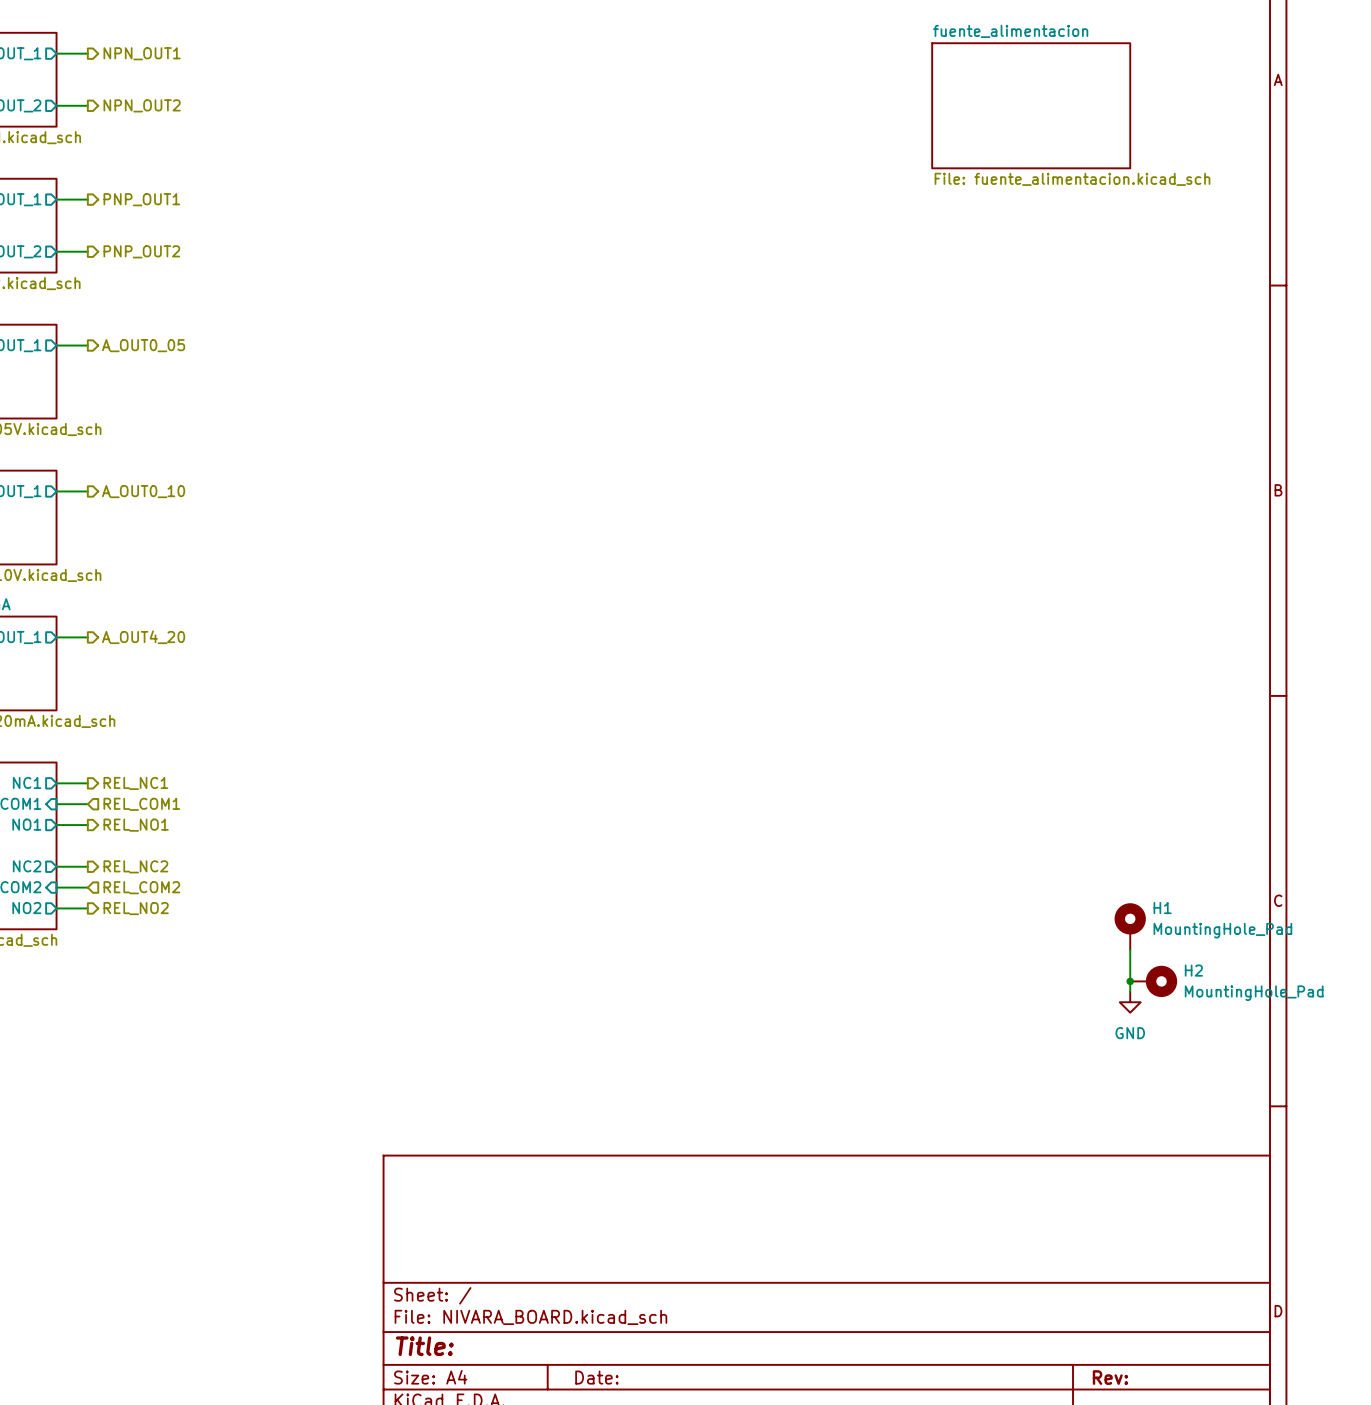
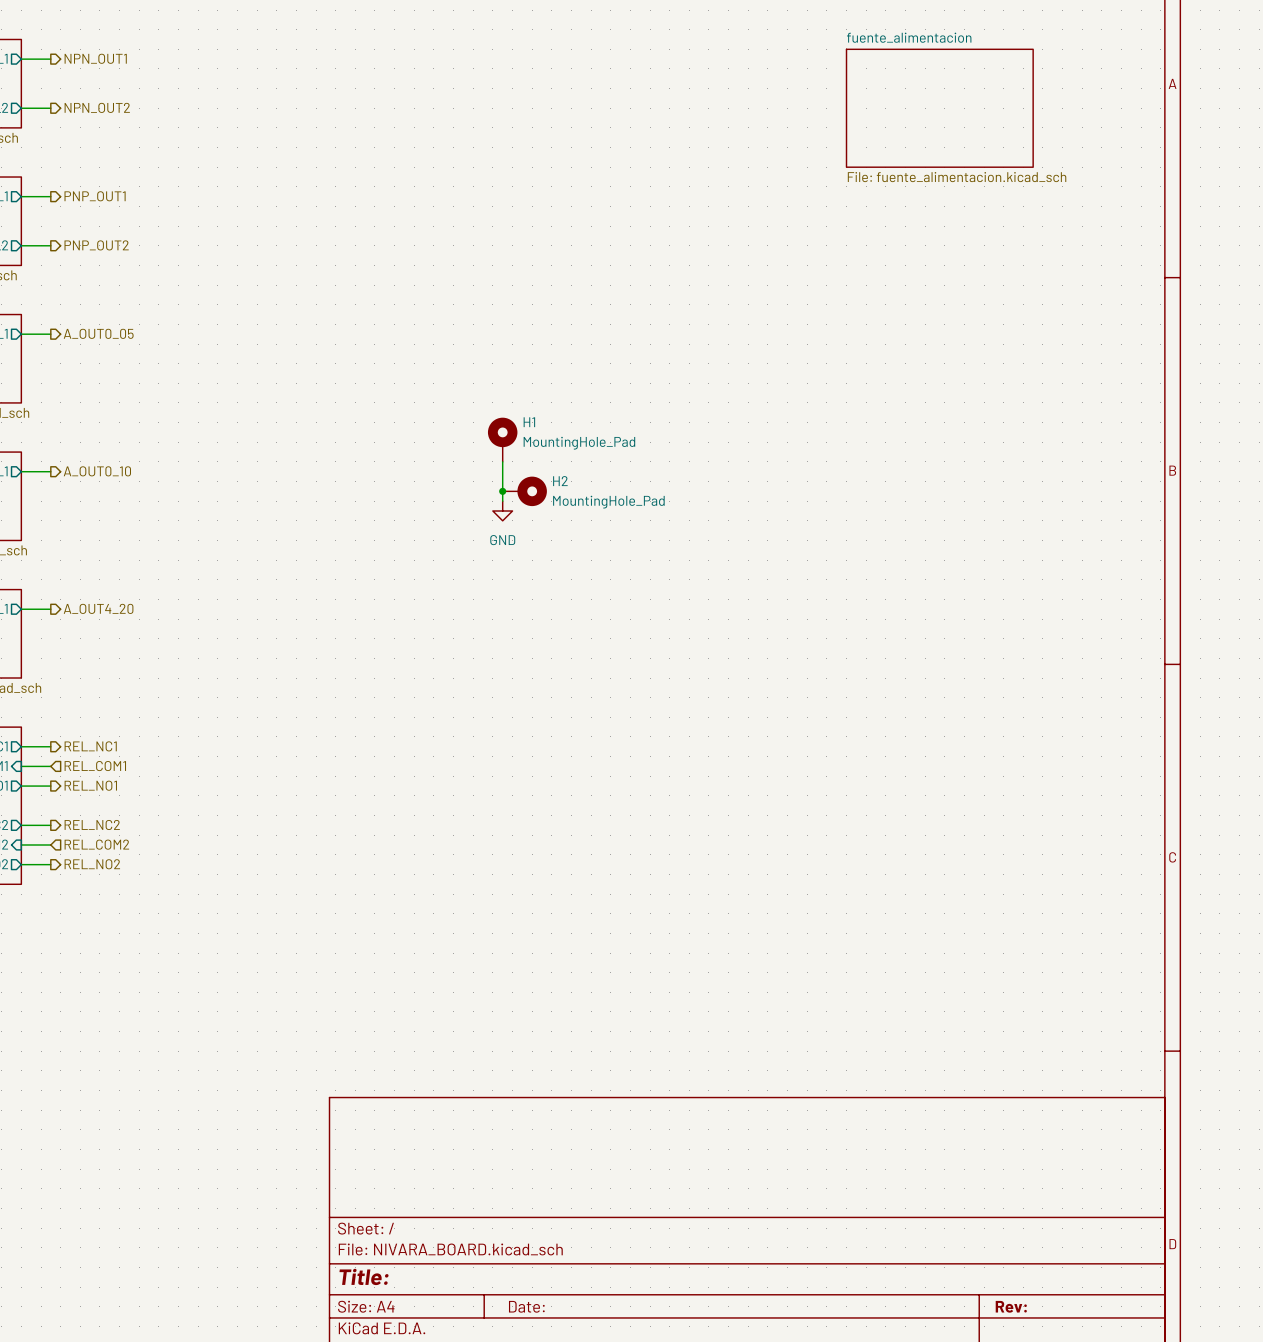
wire: none -> (502, 461) (502, 501)
junction: none -> (502, 491)
power symbol: none -> GND (502, 511)
H1 position: (1130, 926) -> (502, 439)
wire: (1130, 950) (1130, 991) -> none
junction: (1130, 981) -> none
H2 position: (1153, 981) -> (524, 491)
power symbol: GND (1130, 1002) -> none

